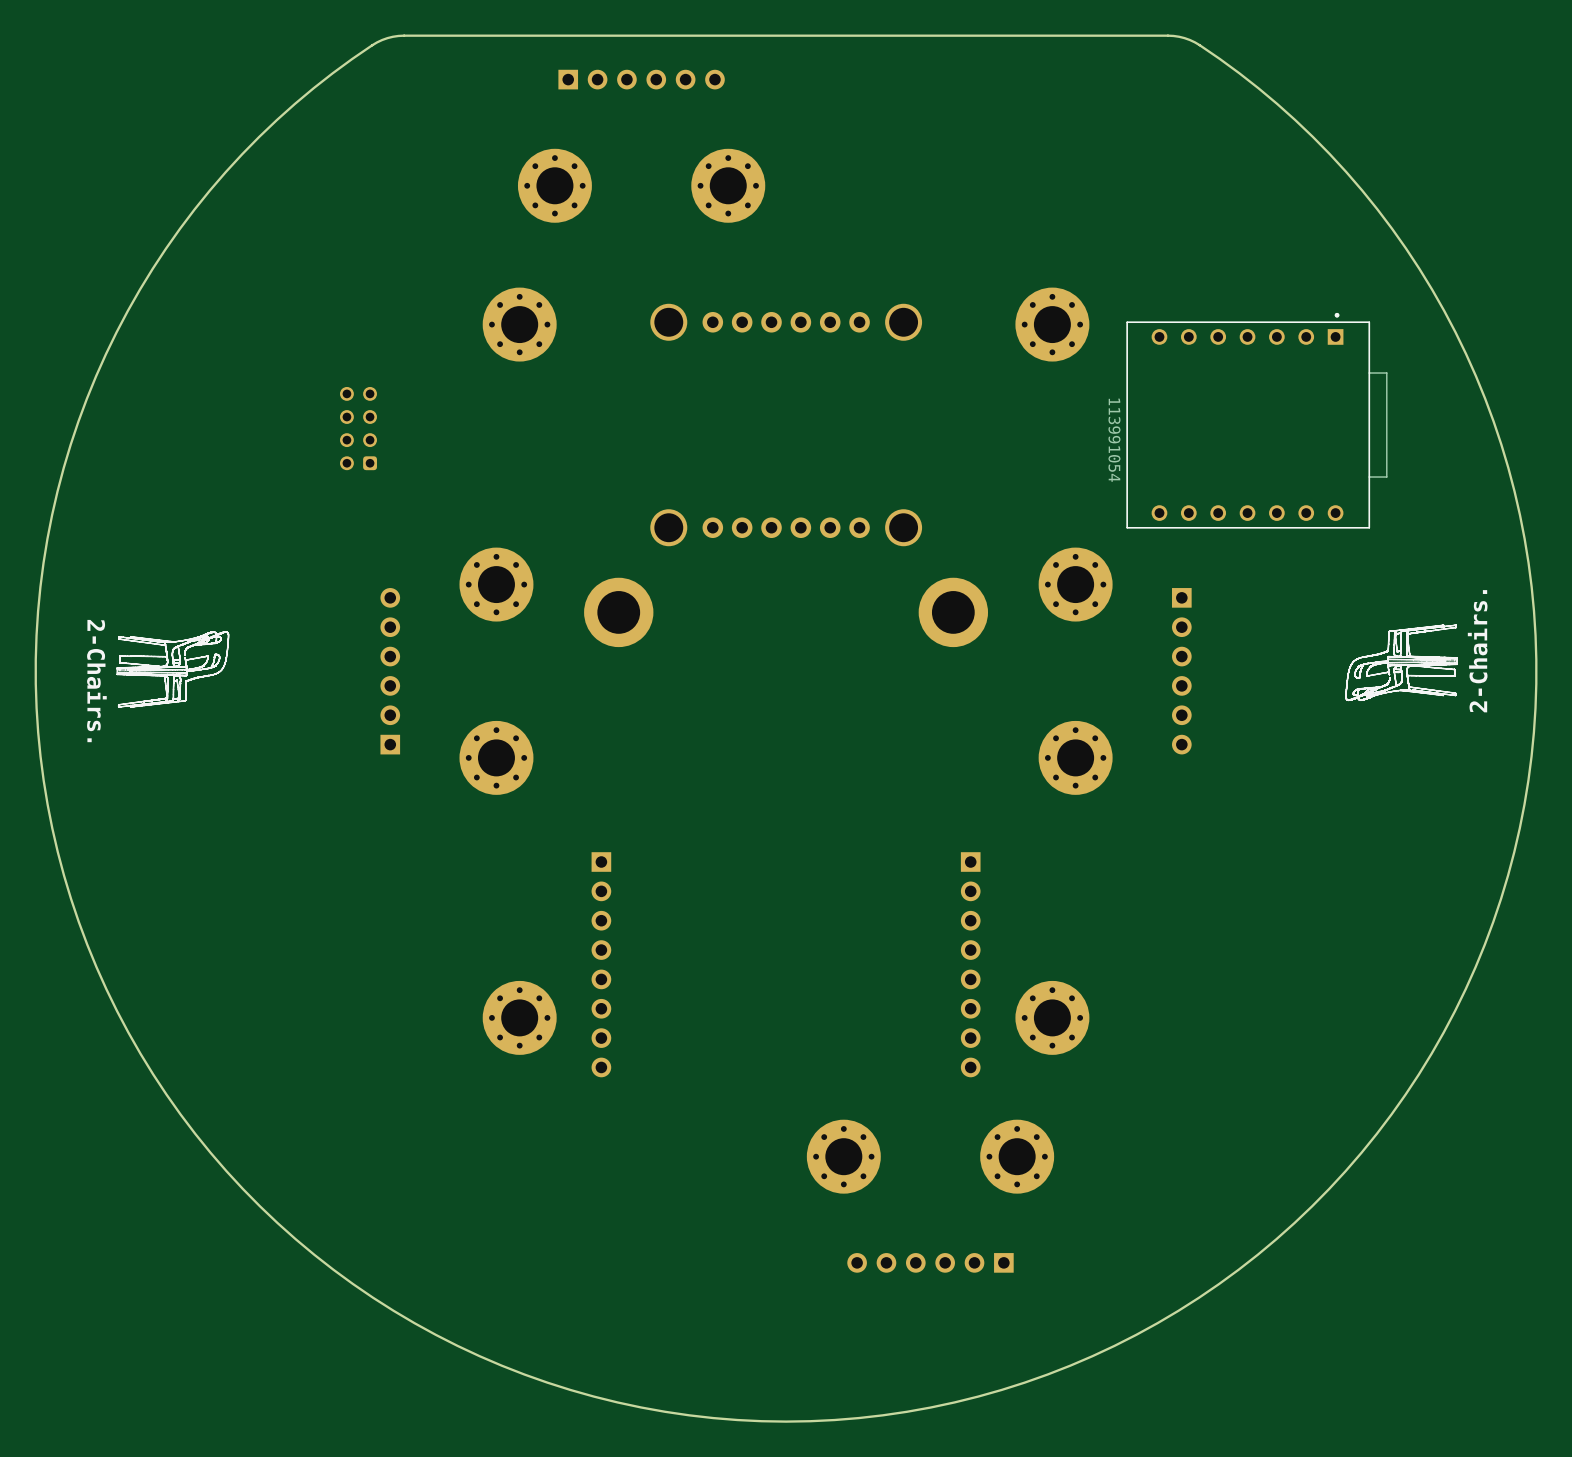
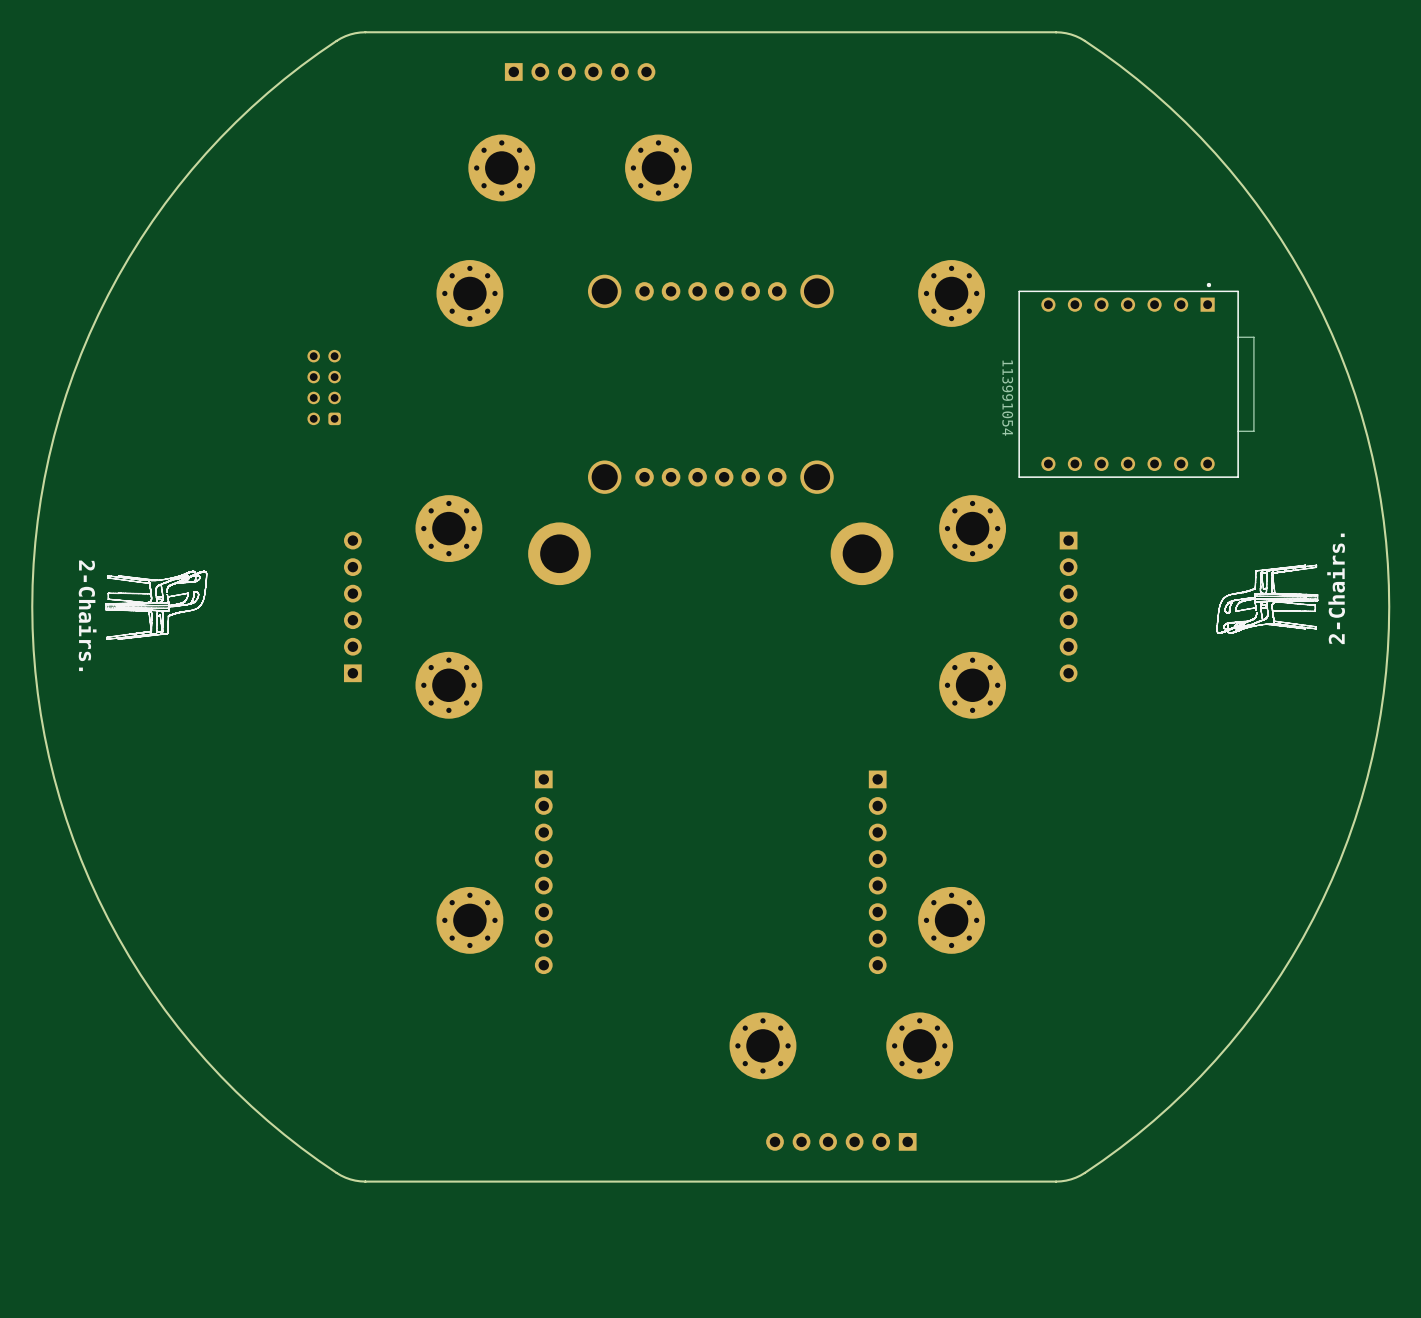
board edge: (1199, 45) (1258, 88) (1295, 120) (1346, 172) (1377, 209) (1419, 268) (1444, 310) (1476, 376) (1493, 421) (1514, 491) (1524, 538) (1534, 611) (1536, 659) (1533, 732) (1528, 780) (1519, 828) (1501, 898) (1475, 967) (1455, 1011) (1431, 1053) (1391, 1114) (1361, 1152) (1312, 1206) (1276, 1239) (1219, 1284) (1178, 1310) (1114, 1345) (1070, 1365) (1001, 1389) (954, 1402) (882, 1415) (834, 1420) (786, 1421) (737, 1420) (665, 1411) (617, 1402) (547, 1382) (501, 1365) (435, 1334) (373, 1297) (333, 1269) (295, 1239) (242, 1188) (195, 1133) (166, 1094) (128, 1032) (106, 989) (78, 921) (64, 875) (52, 828) (40, 756) (36, 708) (36, 635) (40, 586) (47, 538) (57, 491) (78, 421) (96, 376) (127, 310) (152, 268) (194, 209) (225, 172) (276, 120) (332, 73) (372, 45) -> (1084, 40) (1153, 93) (1215, 153) (1268, 221) (1313, 295) (1348, 374) (1372, 457) (1386, 542) (1388, 628) (1380, 714) (1361, 798) (1331, 879) (1292, 956) (1243, 1027) (1185, 1091) (1153, 1120) (1102, 1160) (1075, 1177) (1056, 1181) (355, 1180) (336, 1172) (301, 1147) (235, 1091) (191, 1044) (140, 974) (108, 918) (81, 859) (59, 798) (44, 735) (35, 671) (32, 606) (37, 520) (49, 457) (66, 394) (89, 334) (118, 276) (152, 221) (191, 169) (235, 122) (284, 79) (336, 40)

